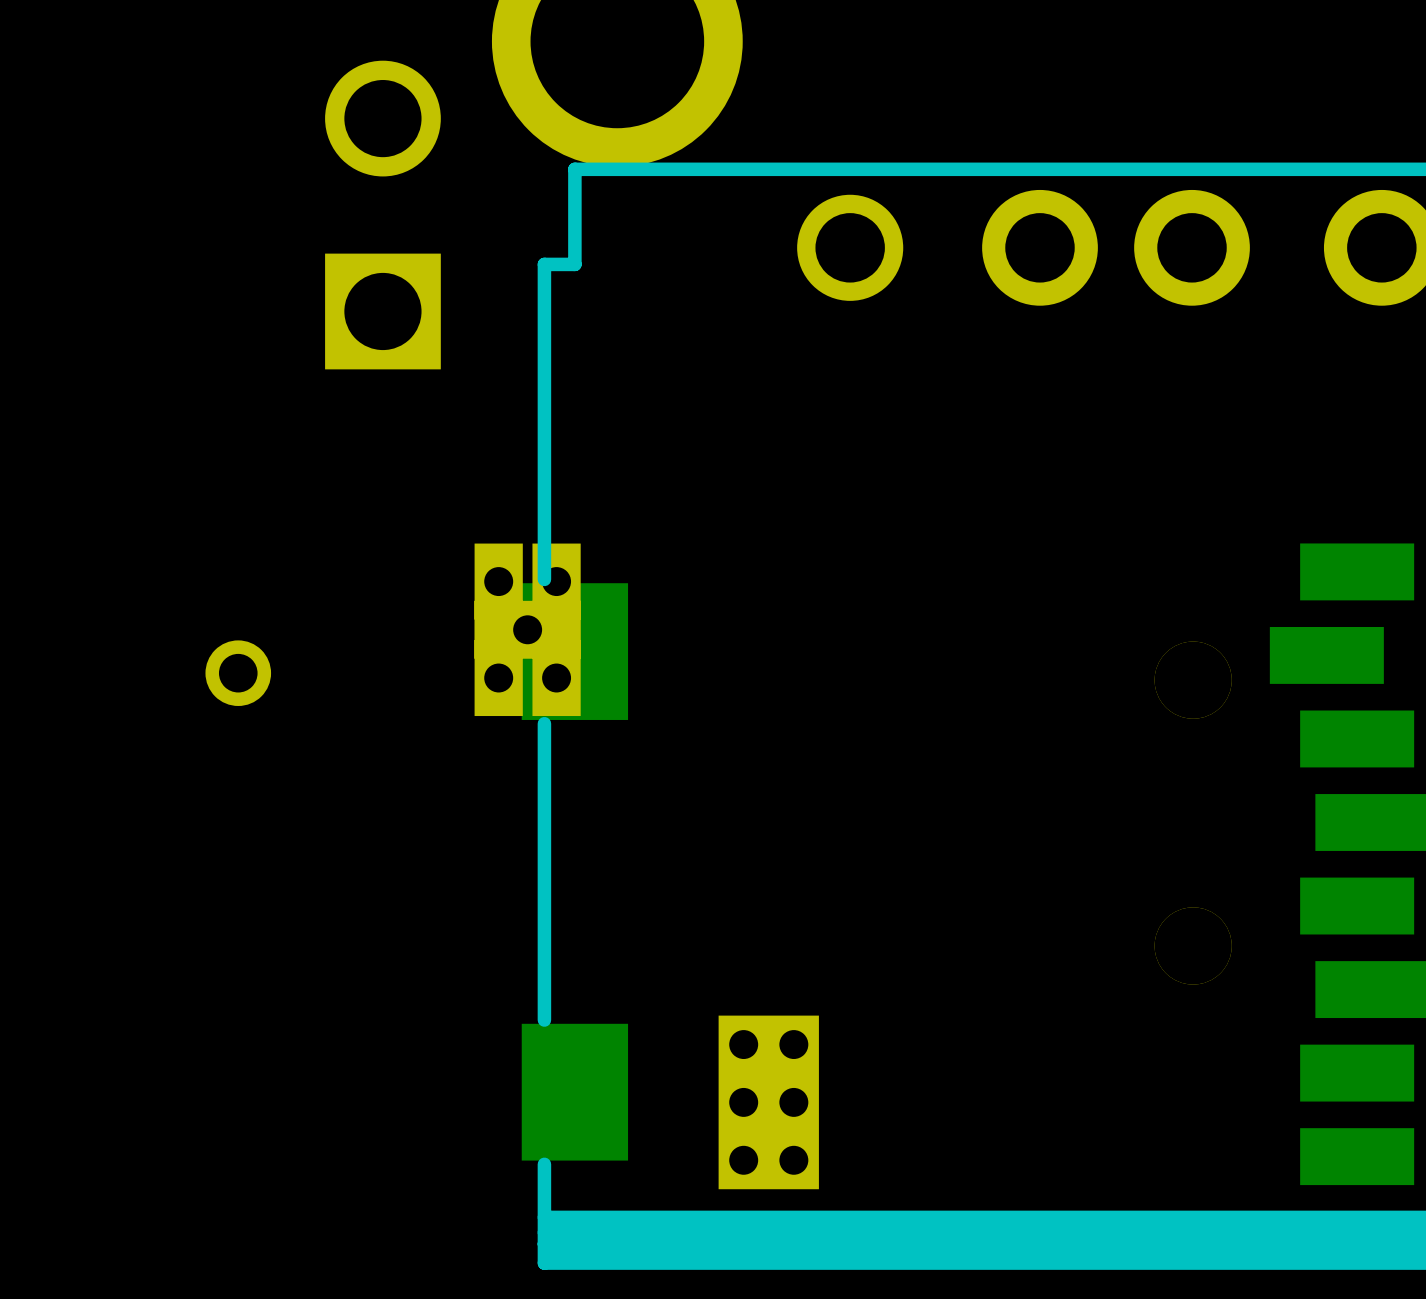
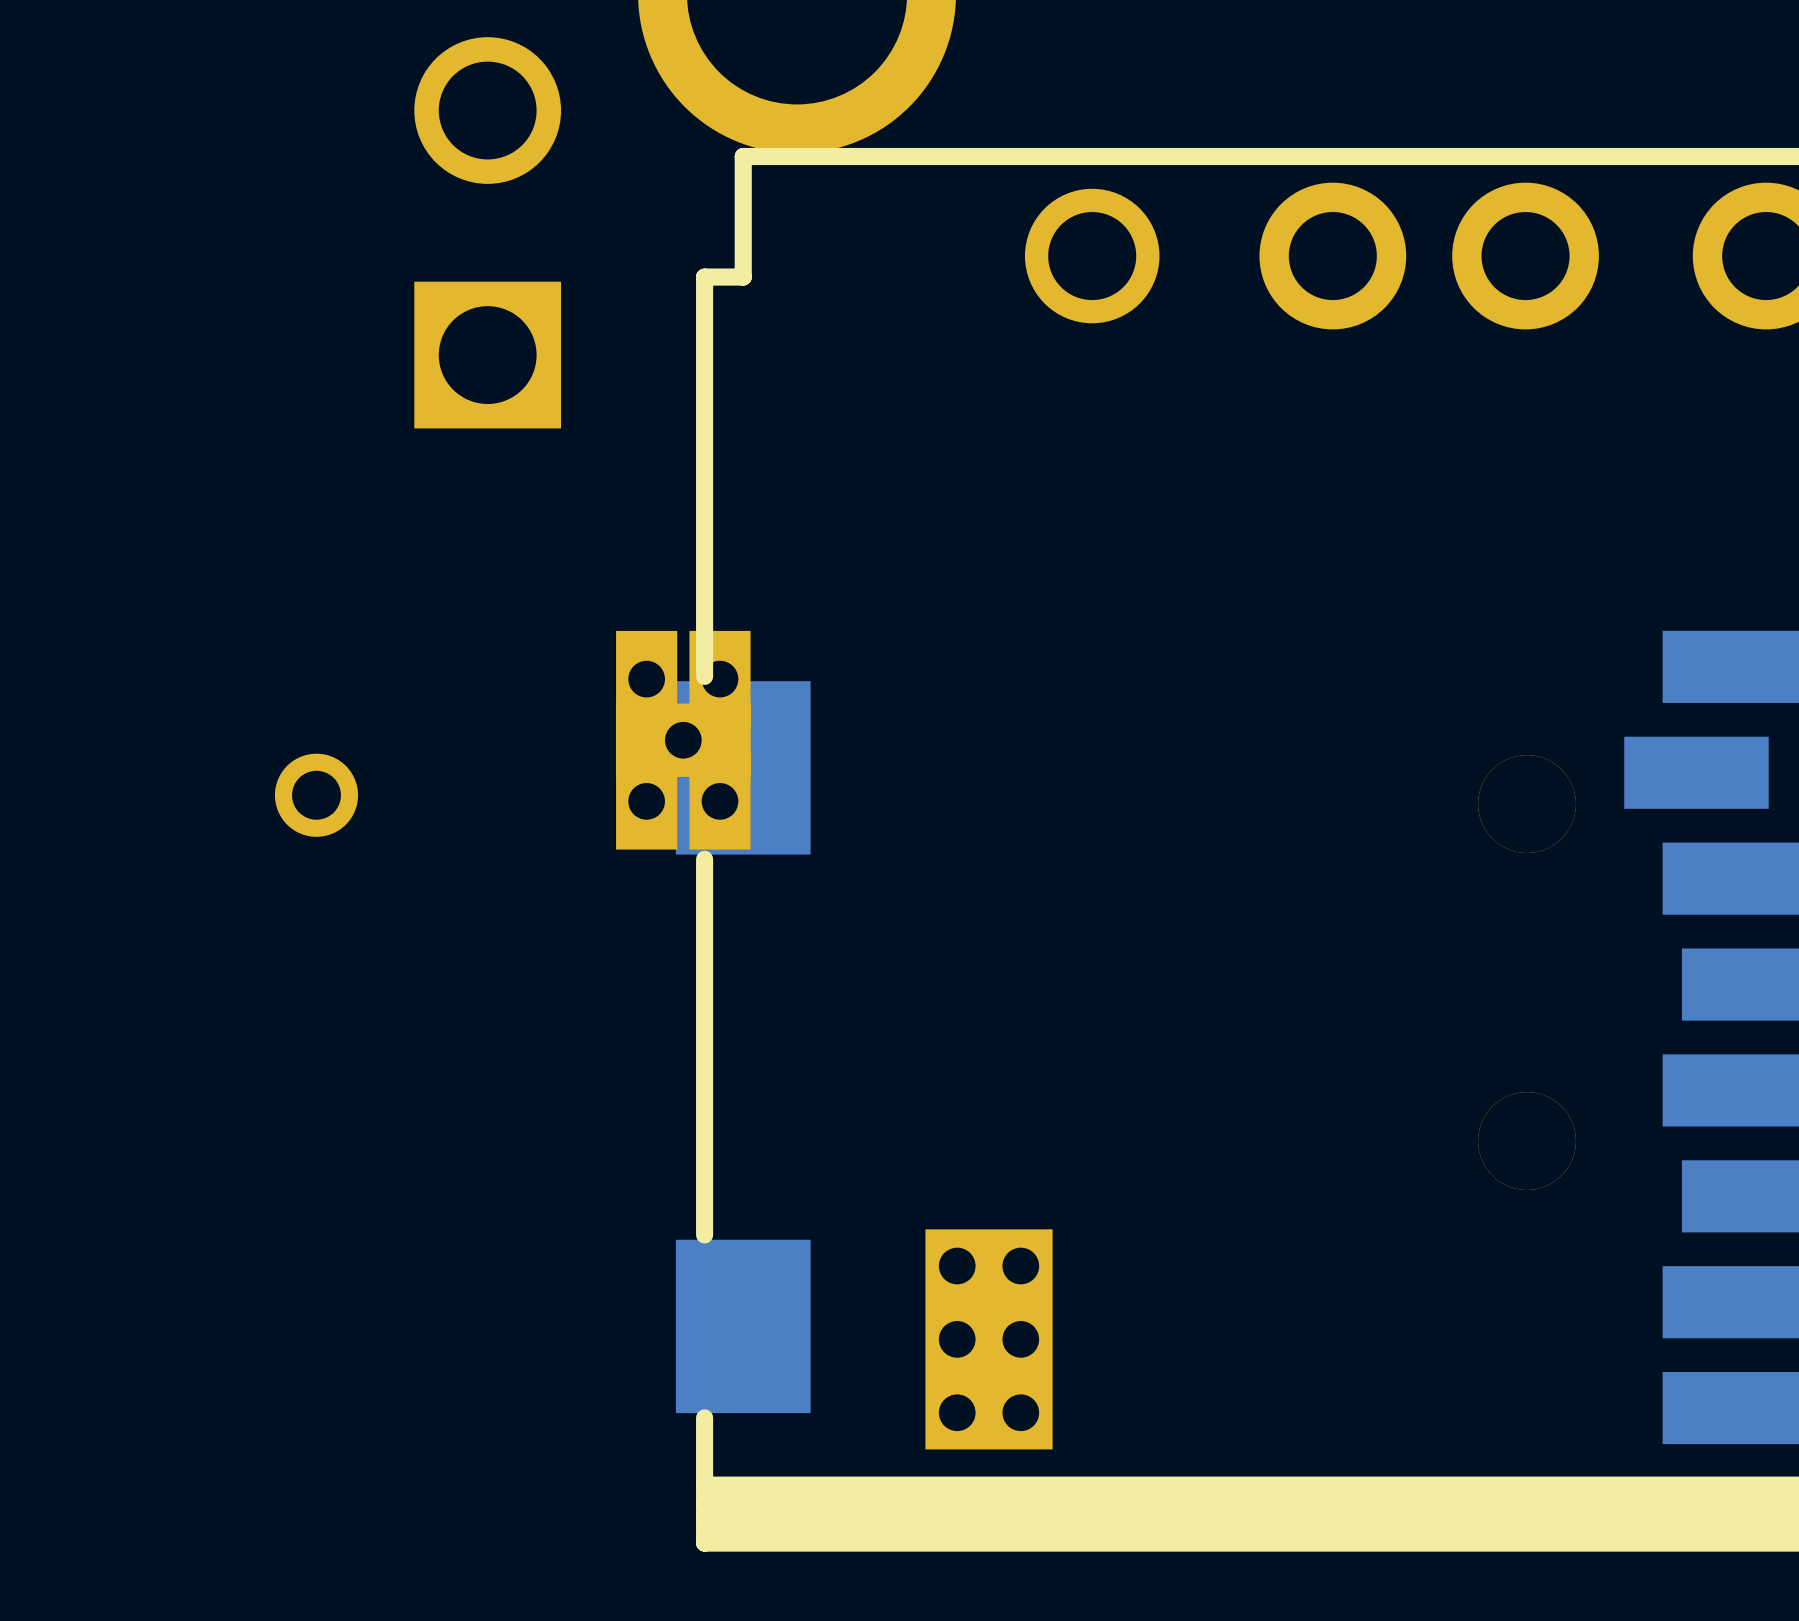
part position: (382, 215) -> (487, 232)

